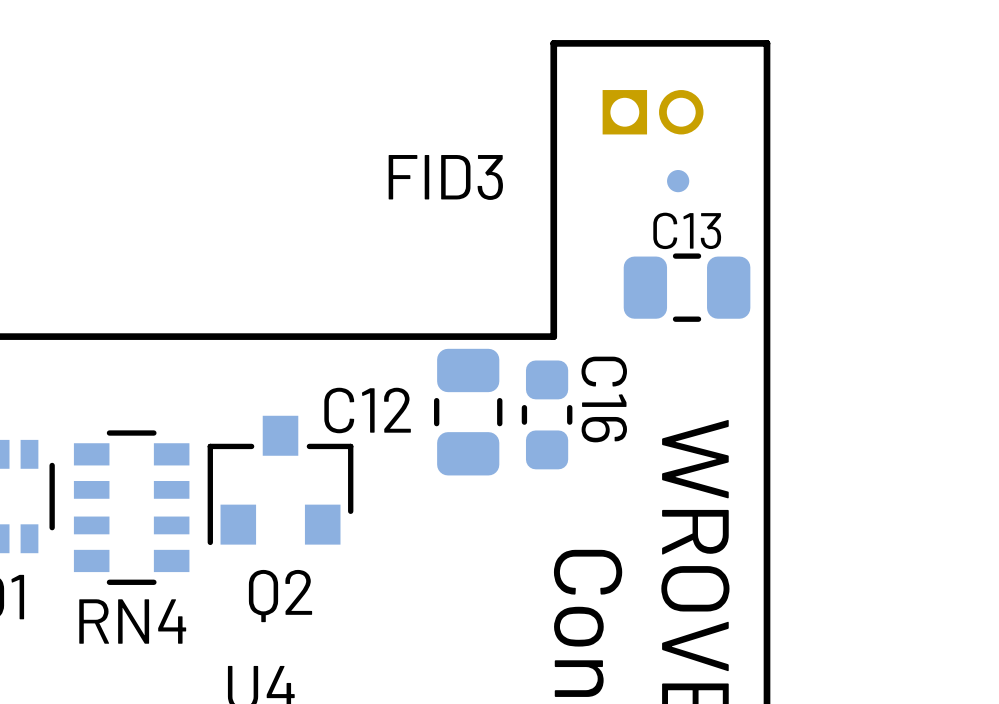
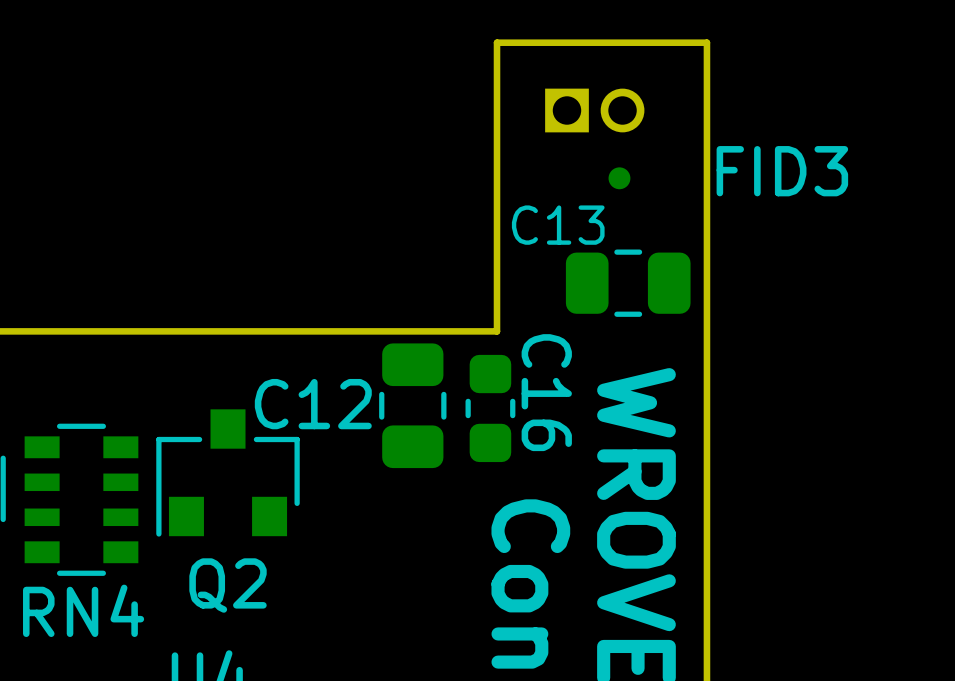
FID3 name position: FID3 (445, 177) -> FID3 (782, 171)
C13 name position: C13 (687, 230) -> C13 (558, 225)

